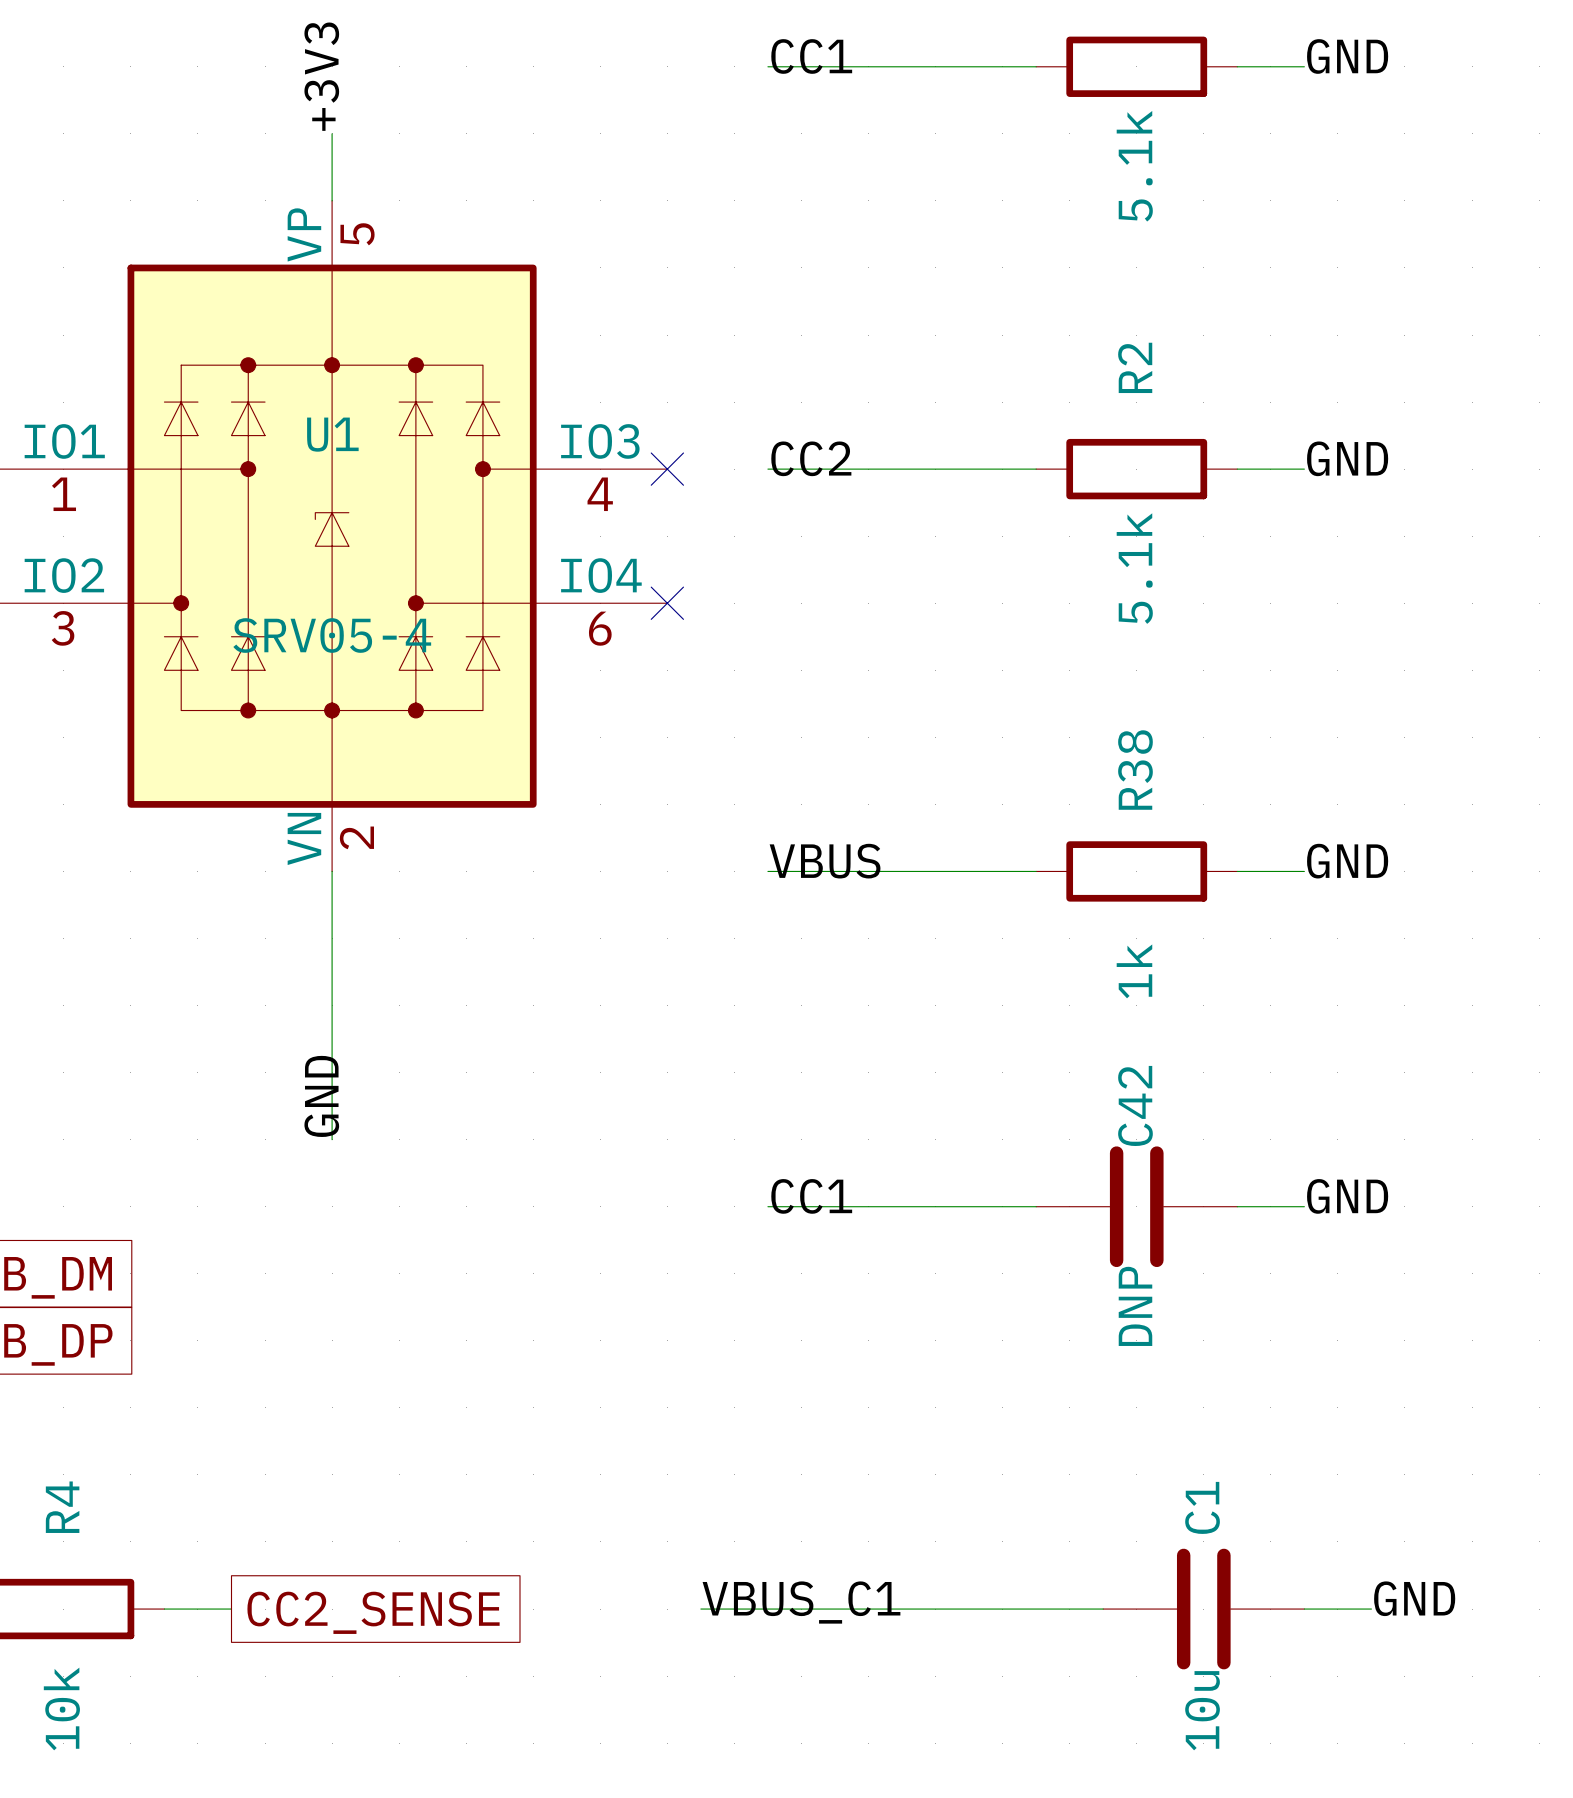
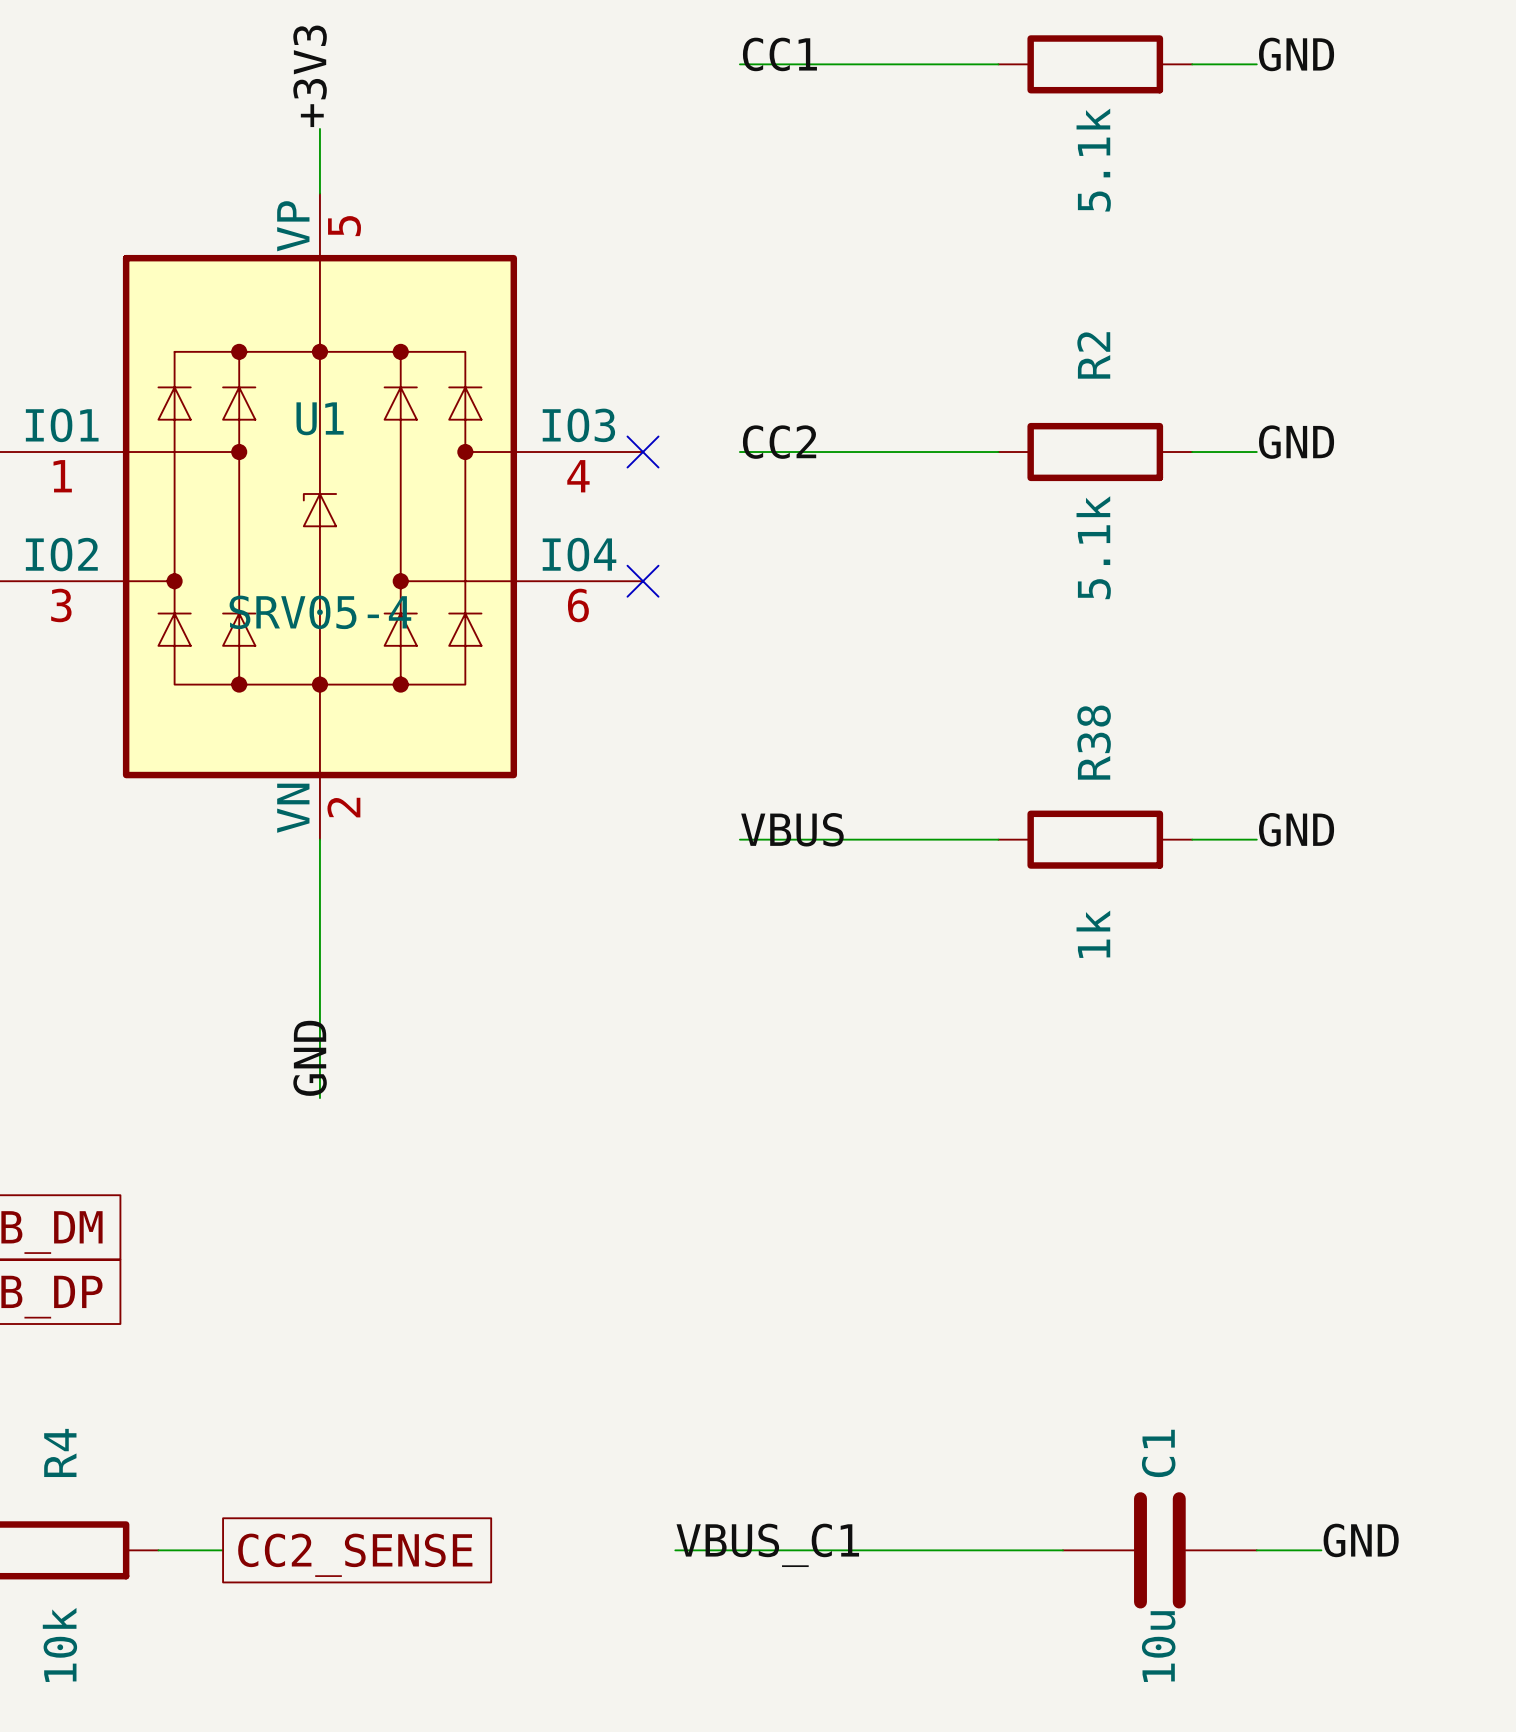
label: CC1 (811, 1196) -> none
label: GND (1347, 1196) -> none
wire: (767, 1206) (1036, 1206) -> none
C42: DNP (1136, 1206) -> none
wire: (1237, 1206) (1304, 1206) -> none

